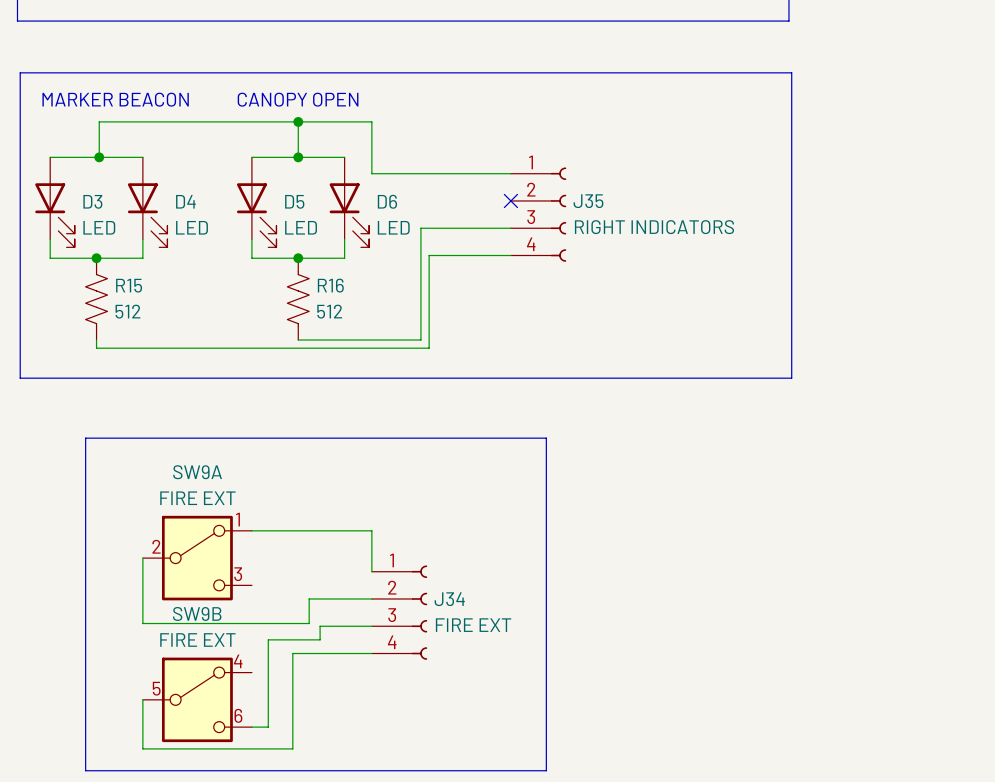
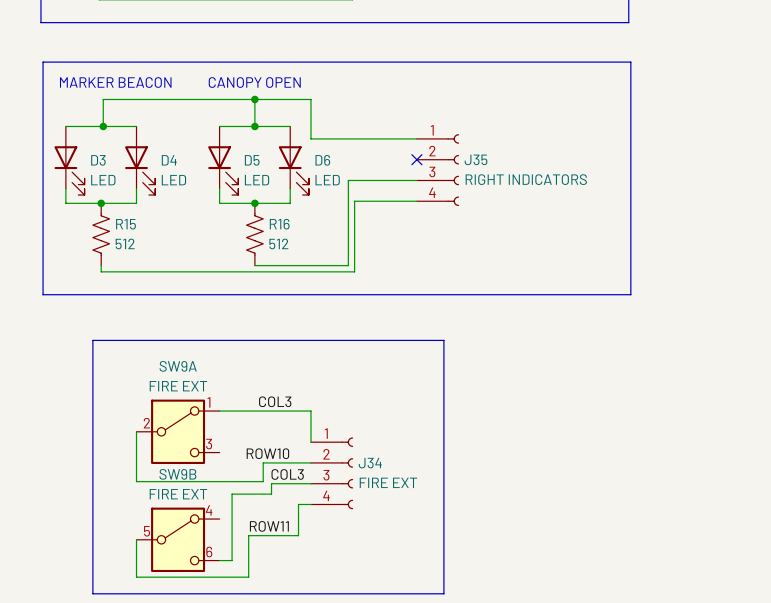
label: none -> COL3 (275, 401)
label: none -> ROW10 (267, 453)
label: none -> COL3 (287, 474)
wire: (355, 653) (292, 653) (292, 748) (290, 748) -> (298, 504) (298, 535) (248, 535) (248, 577)
label: none -> ROW11 (269, 526)

